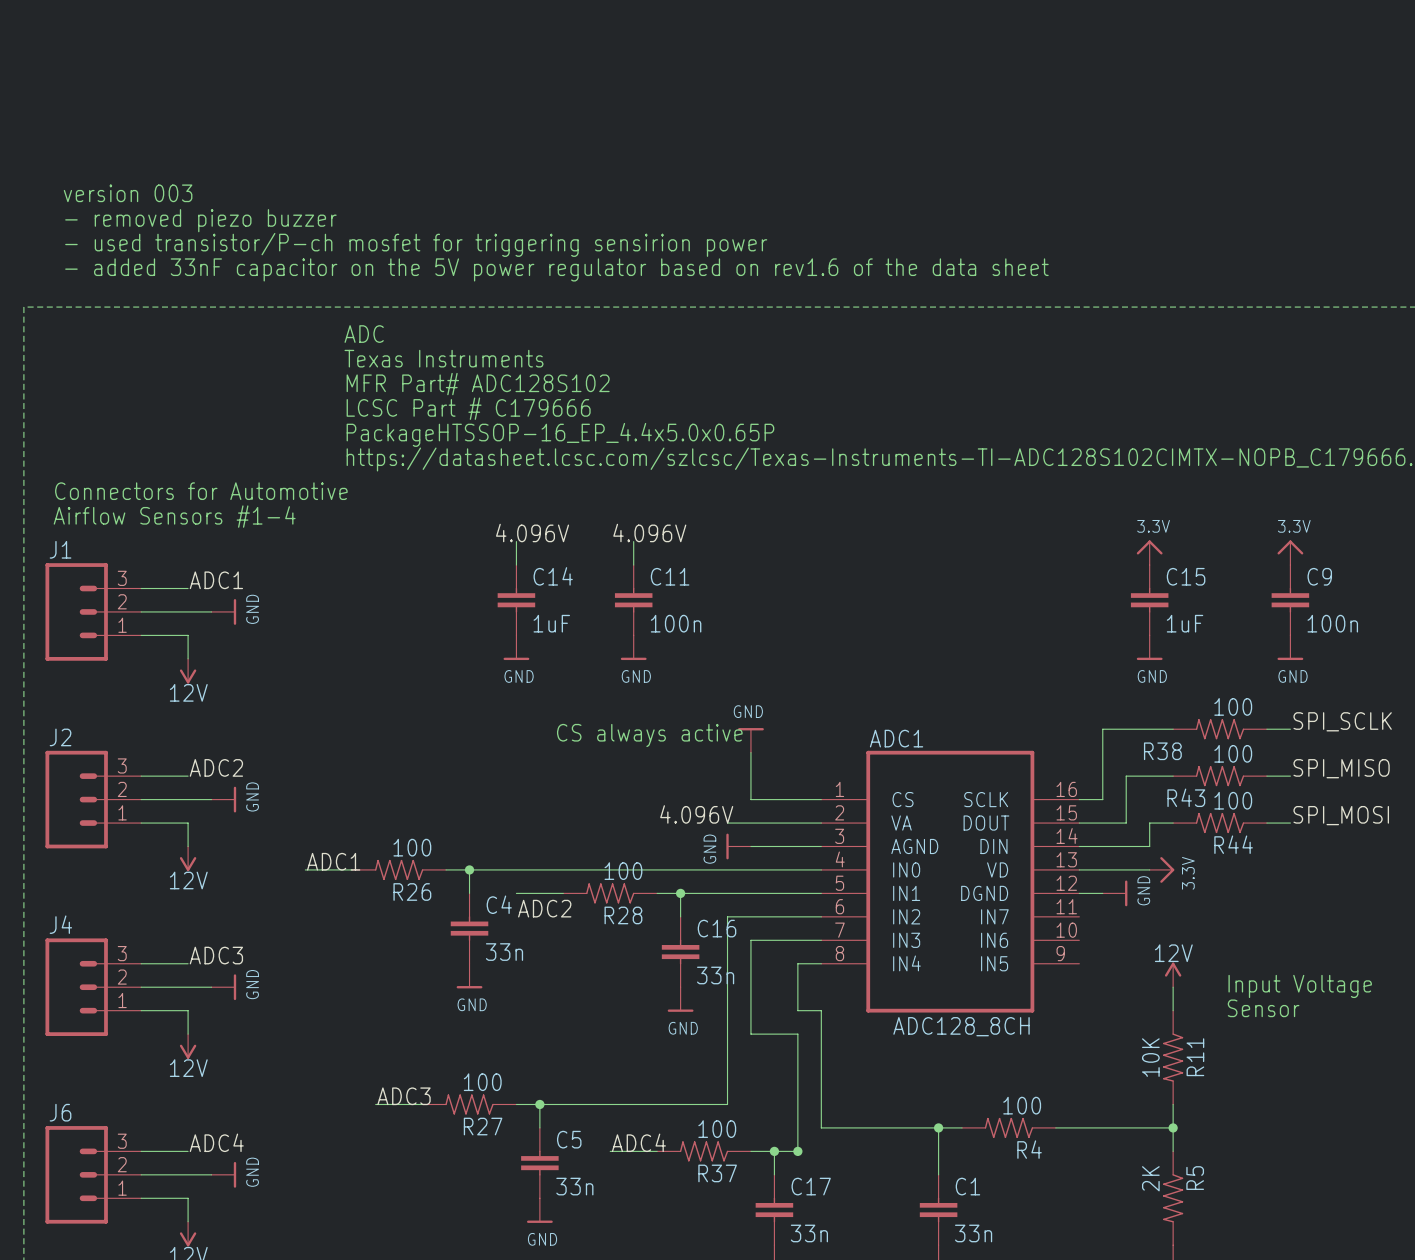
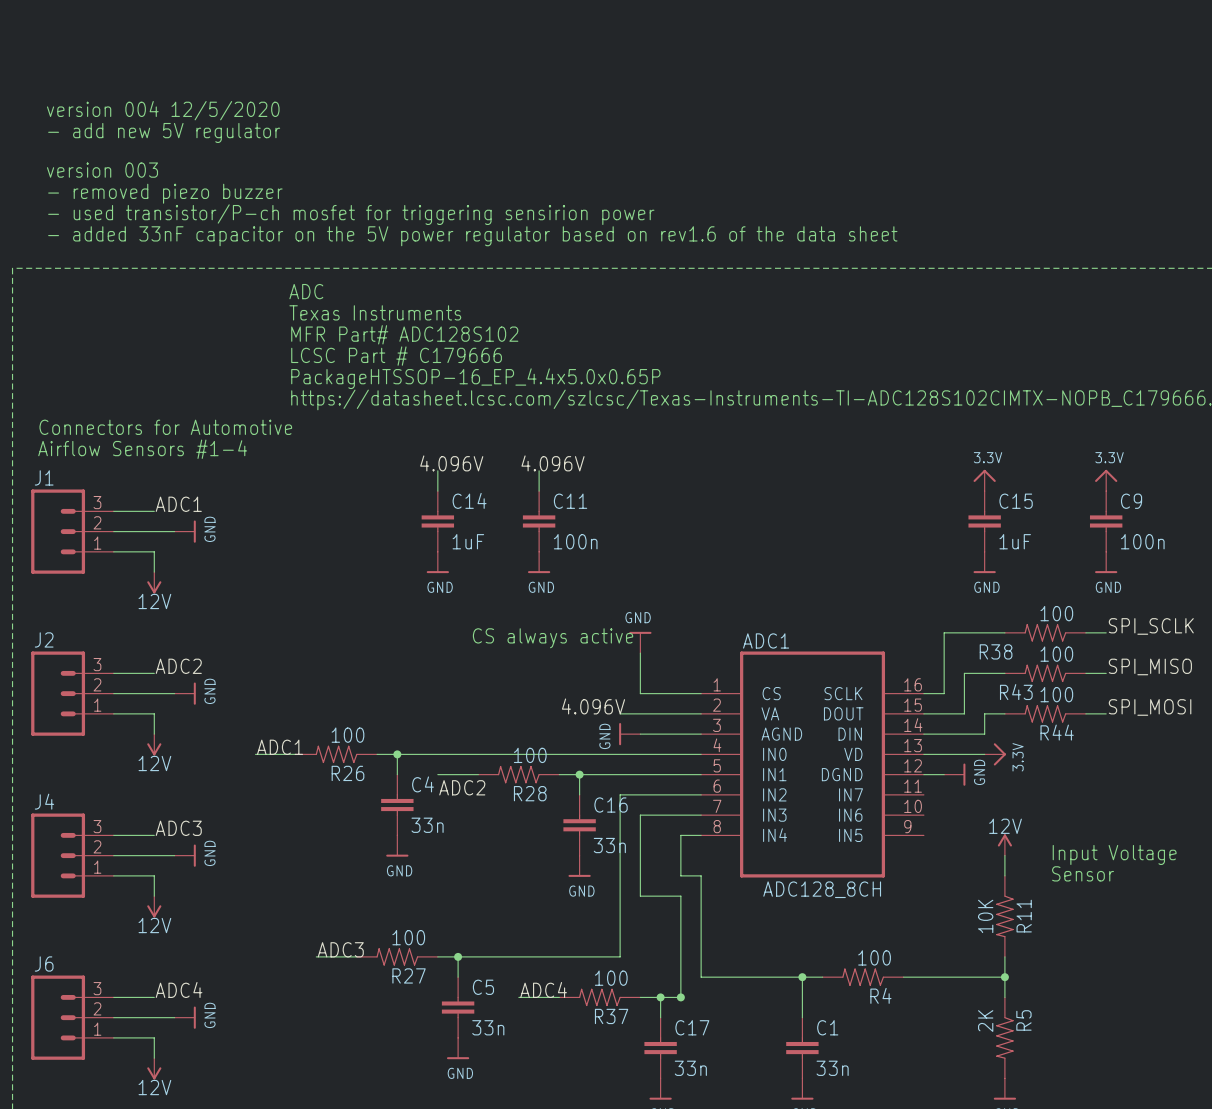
text: none -> version 004 12/5/2020 (163, 110)
text: none -> - add new 5V regulator (164, 132)

